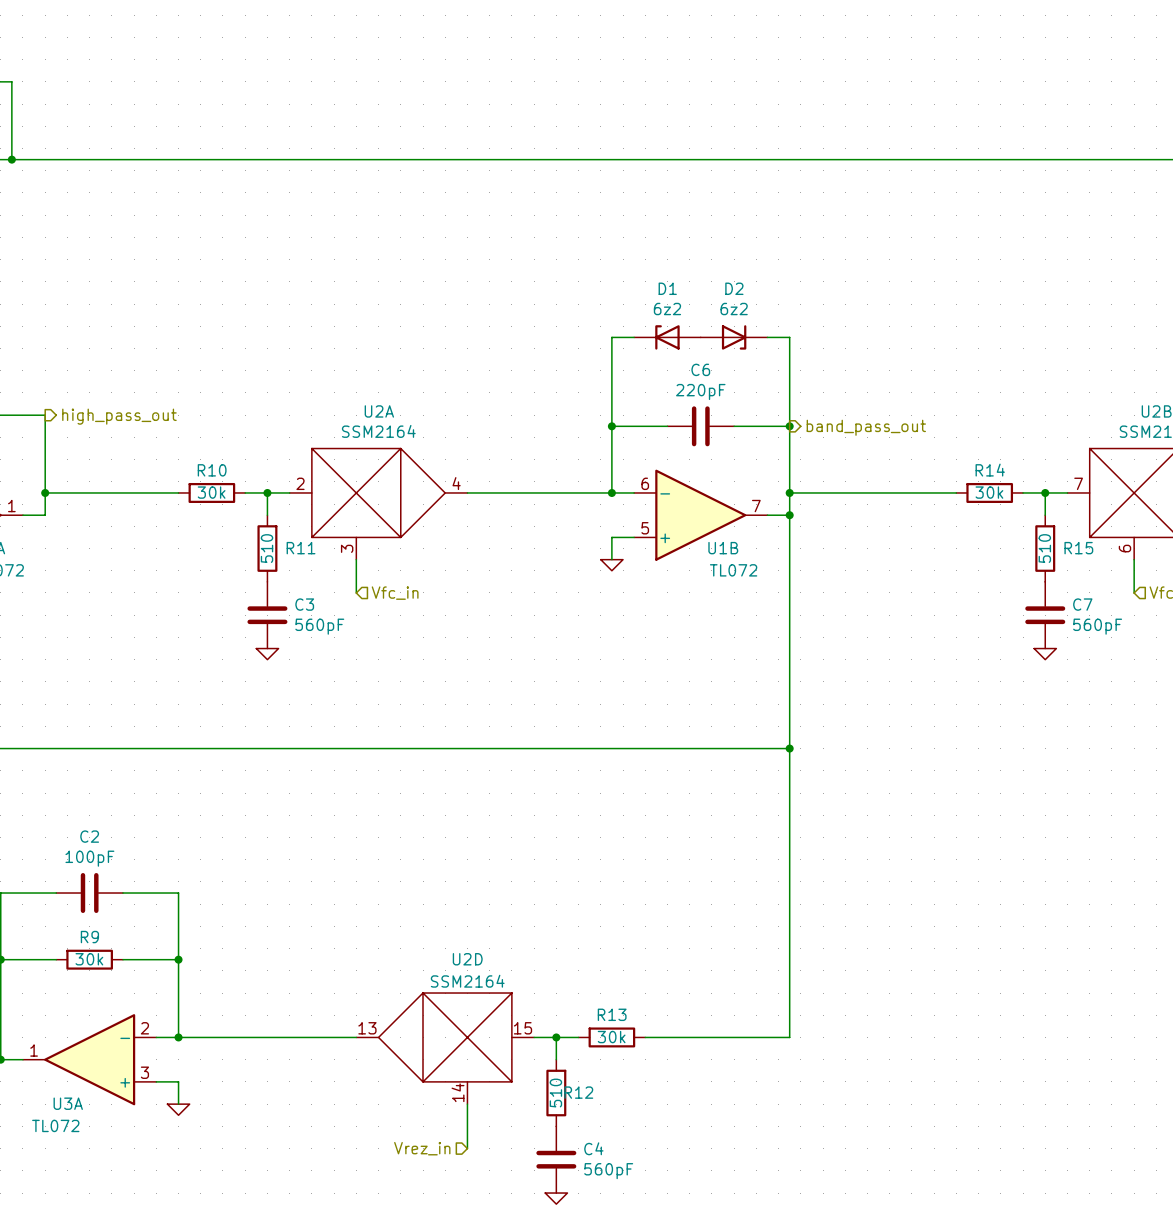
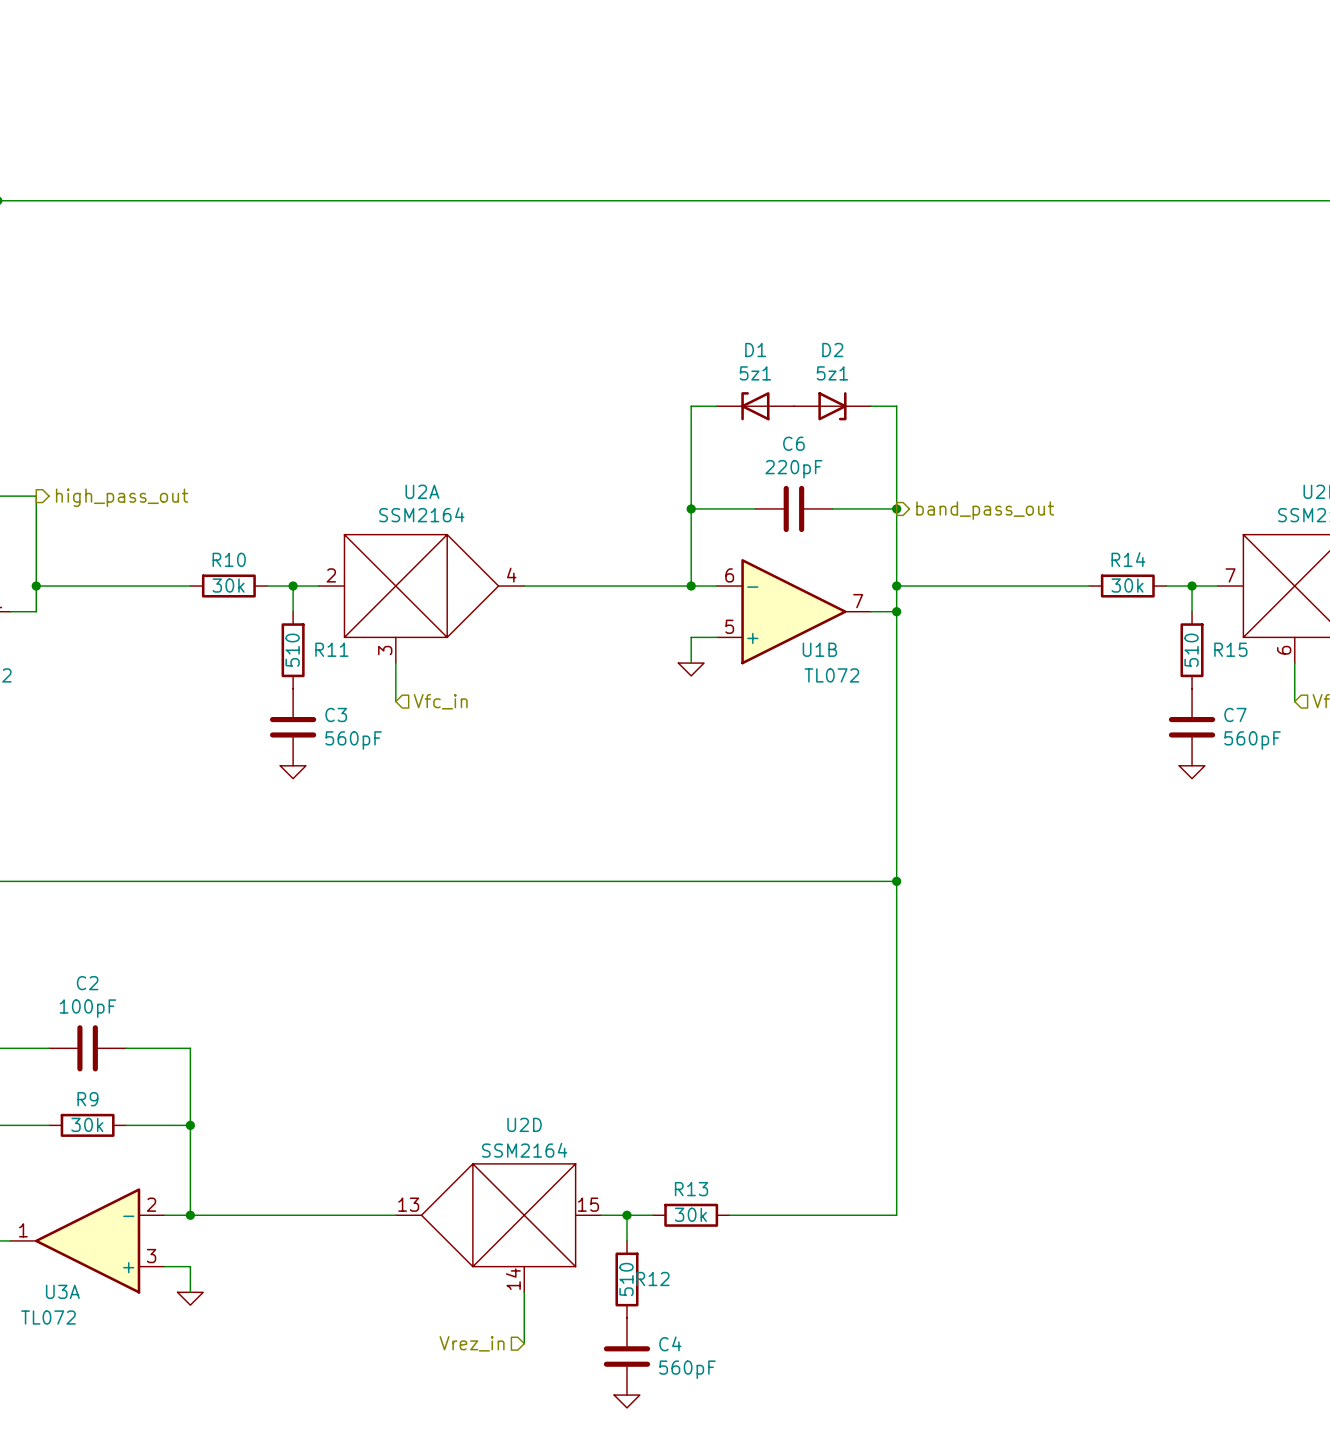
D1 value: 6z2 (667, 309) -> 5z1 (755, 373)
D2 value: 6z2 (734, 309) -> 5z1 (832, 373)

